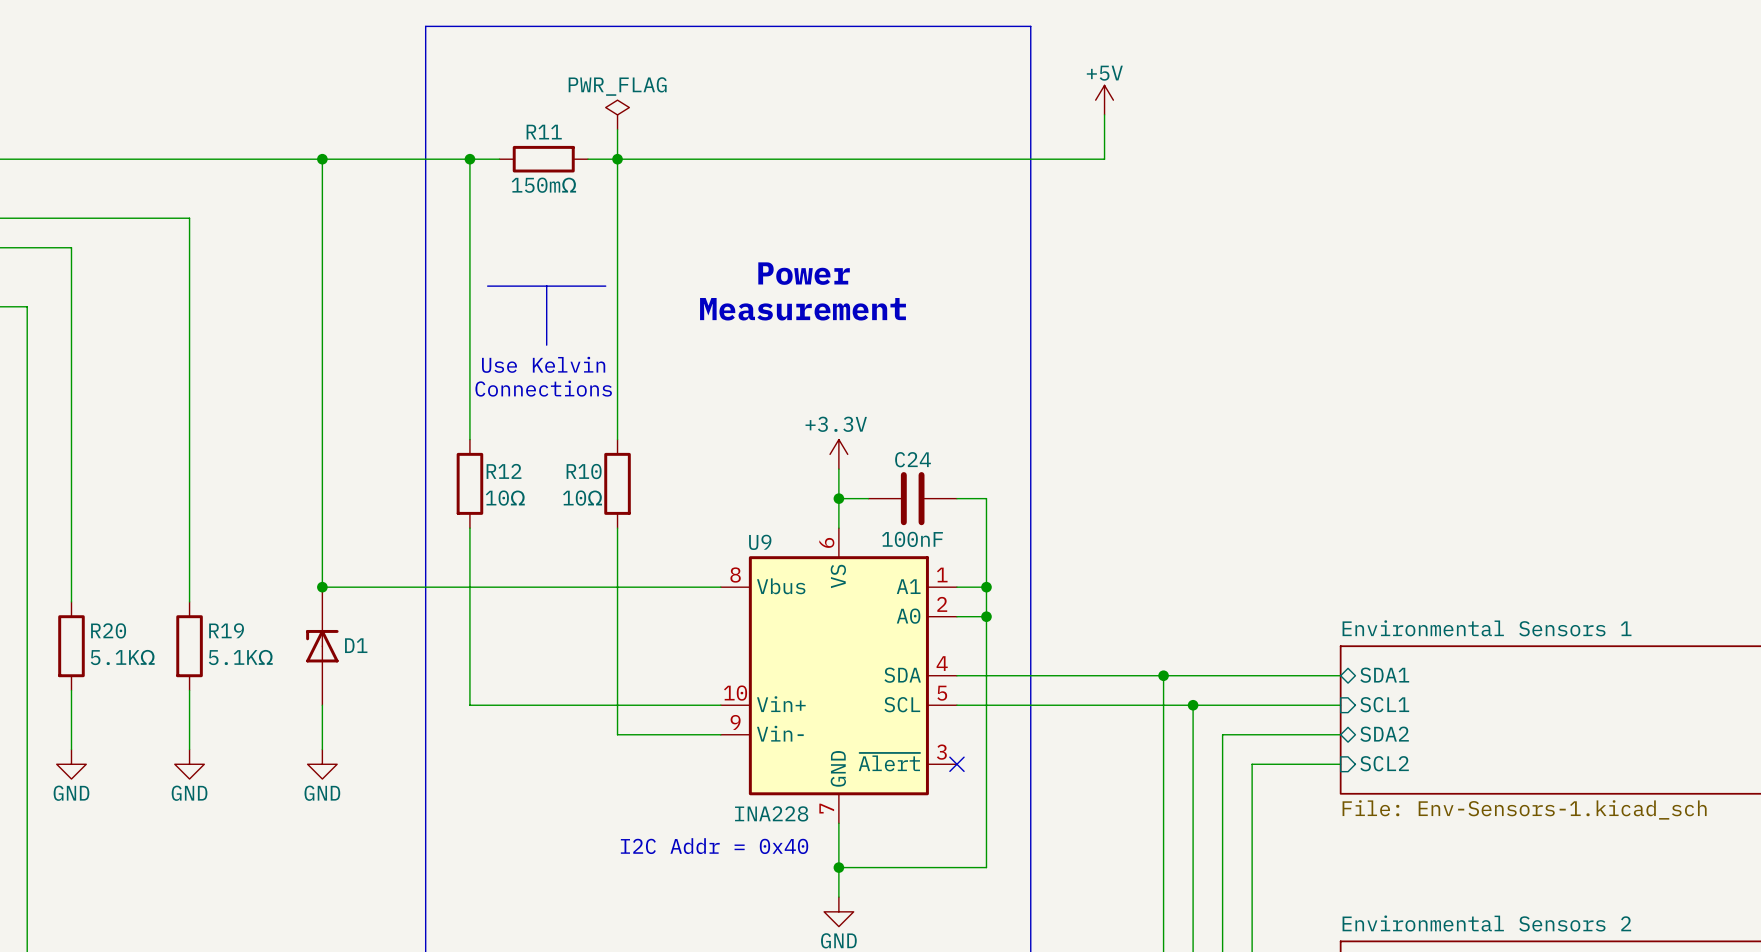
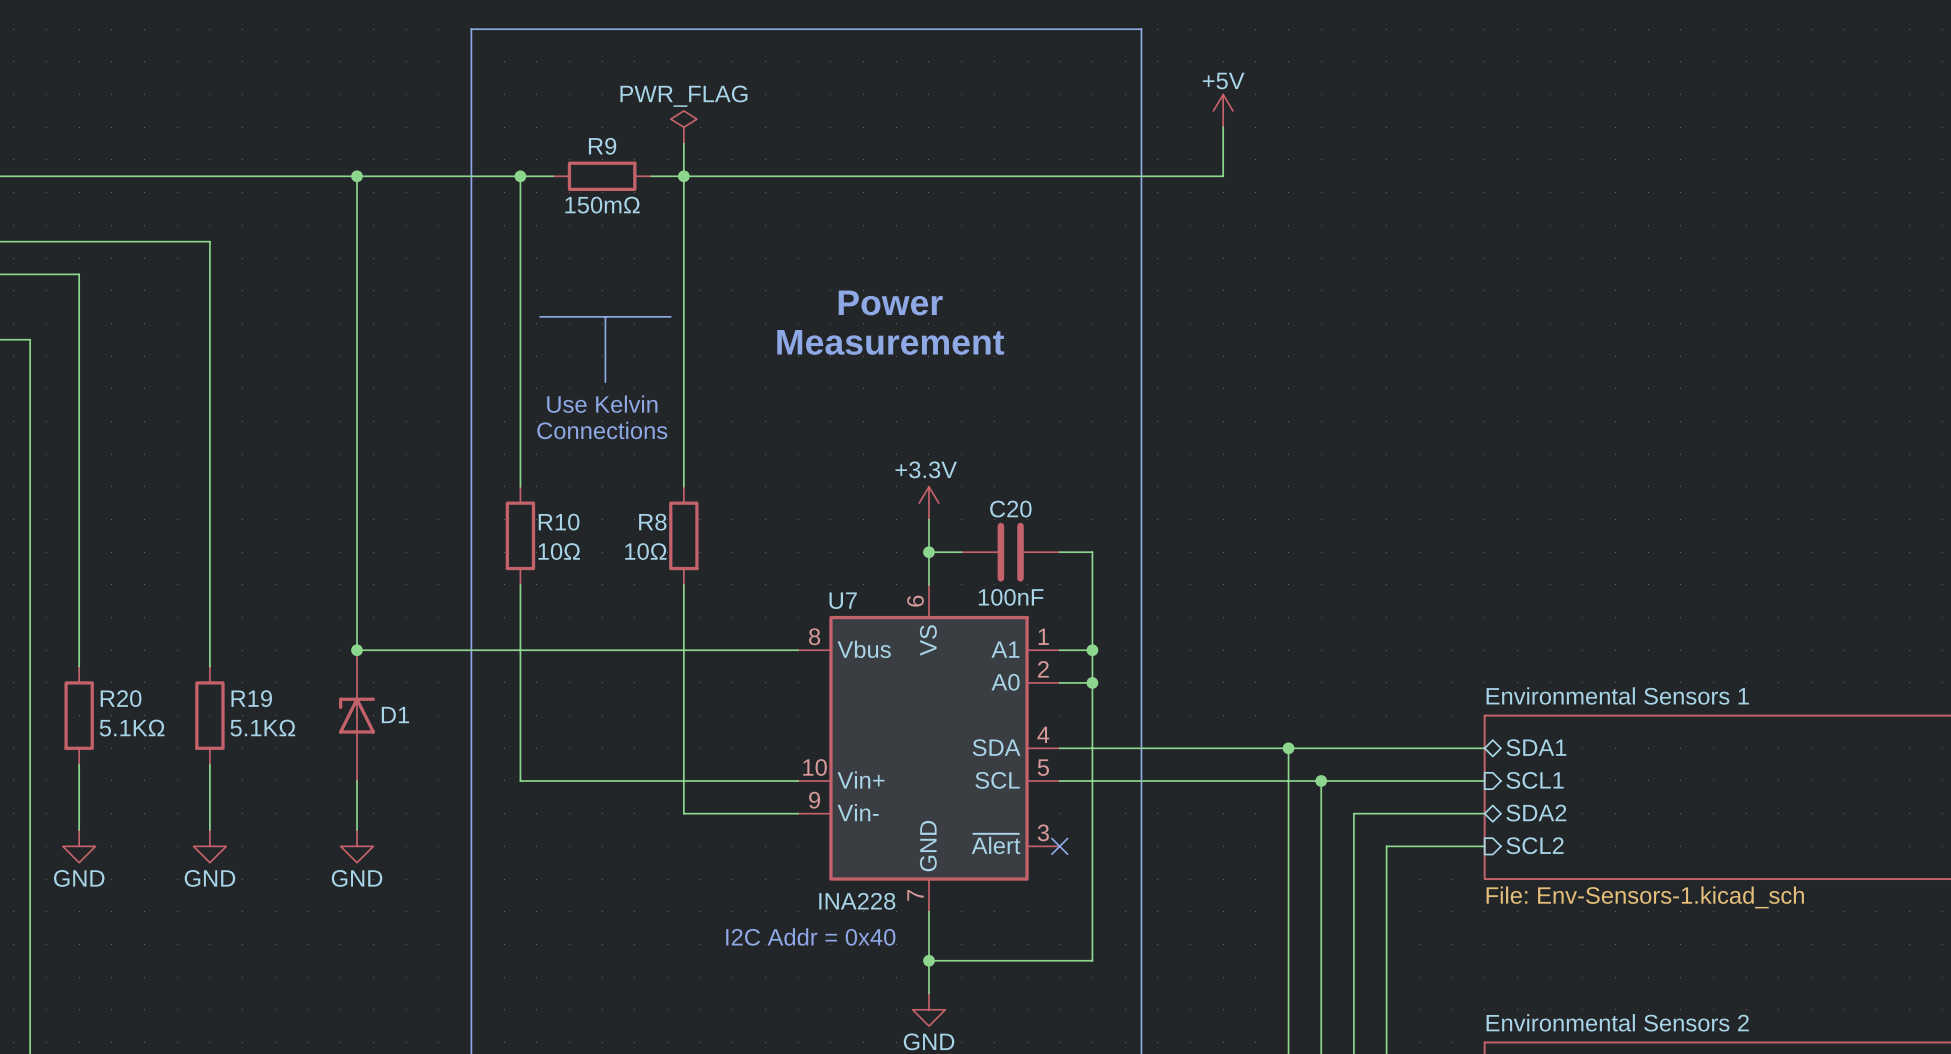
R11 name: R11 (544, 132) -> R9 (602, 146)
C24 name: C24 (913, 459) -> C20 (1010, 509)
R12 name: R12 (504, 471) -> R10 (559, 522)
R10 name: R10 (584, 471) -> R8 (652, 522)
U9 name: U9 (760, 542) -> U7 (843, 600)

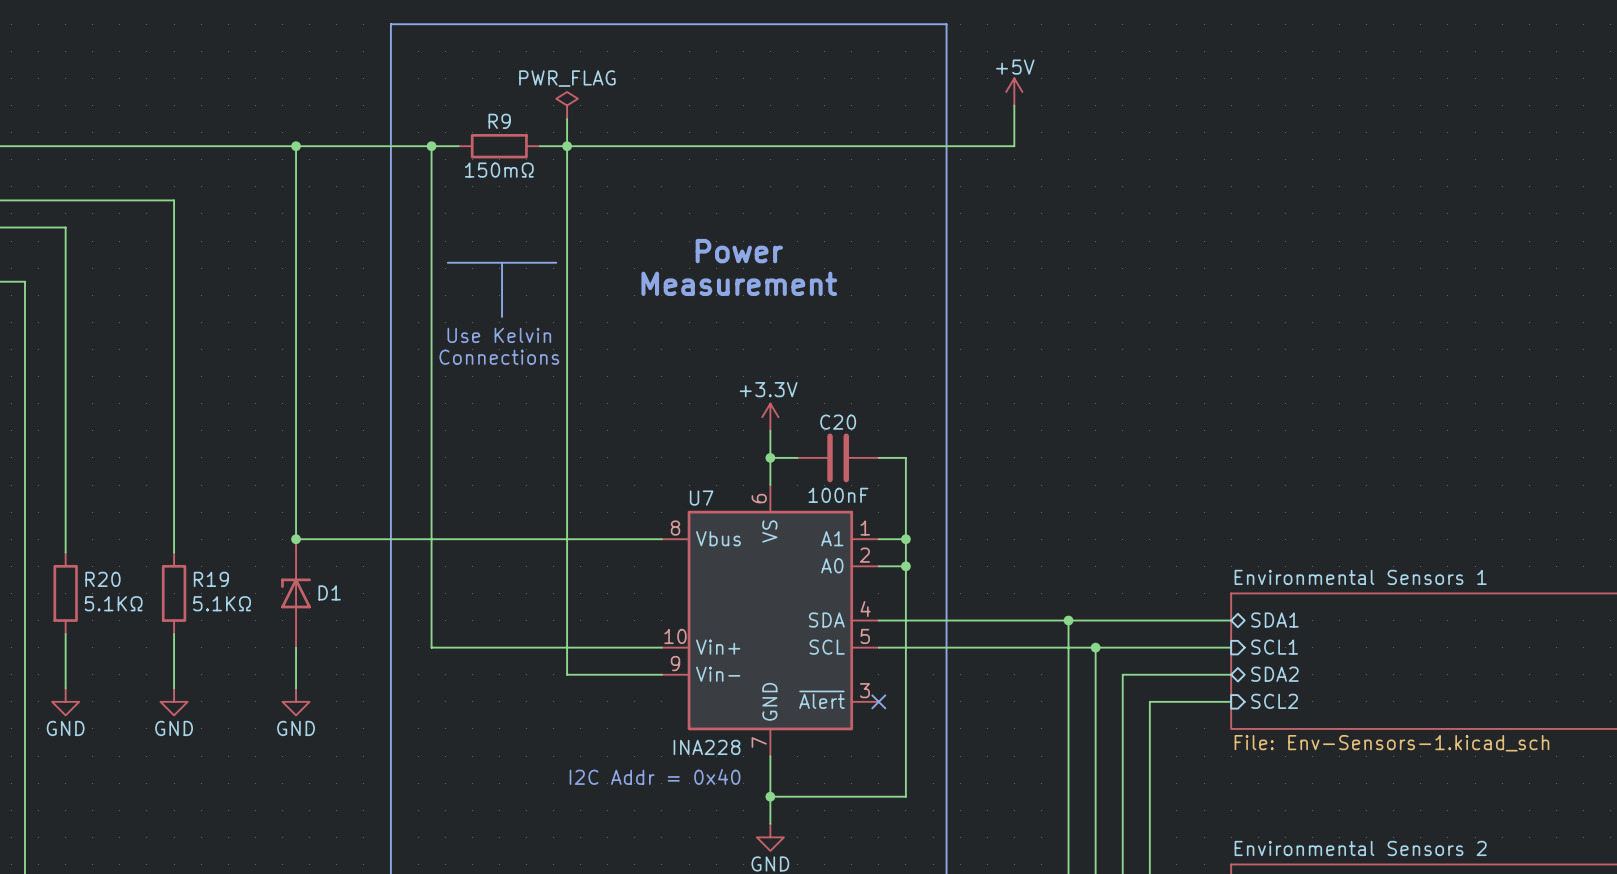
wire: none -> (431, 403) (431, 485)
wire: none -> (567, 403) (567, 485)
R10: 10Ω (520, 535) -> none
R8: 10Ω (683, 535) -> none

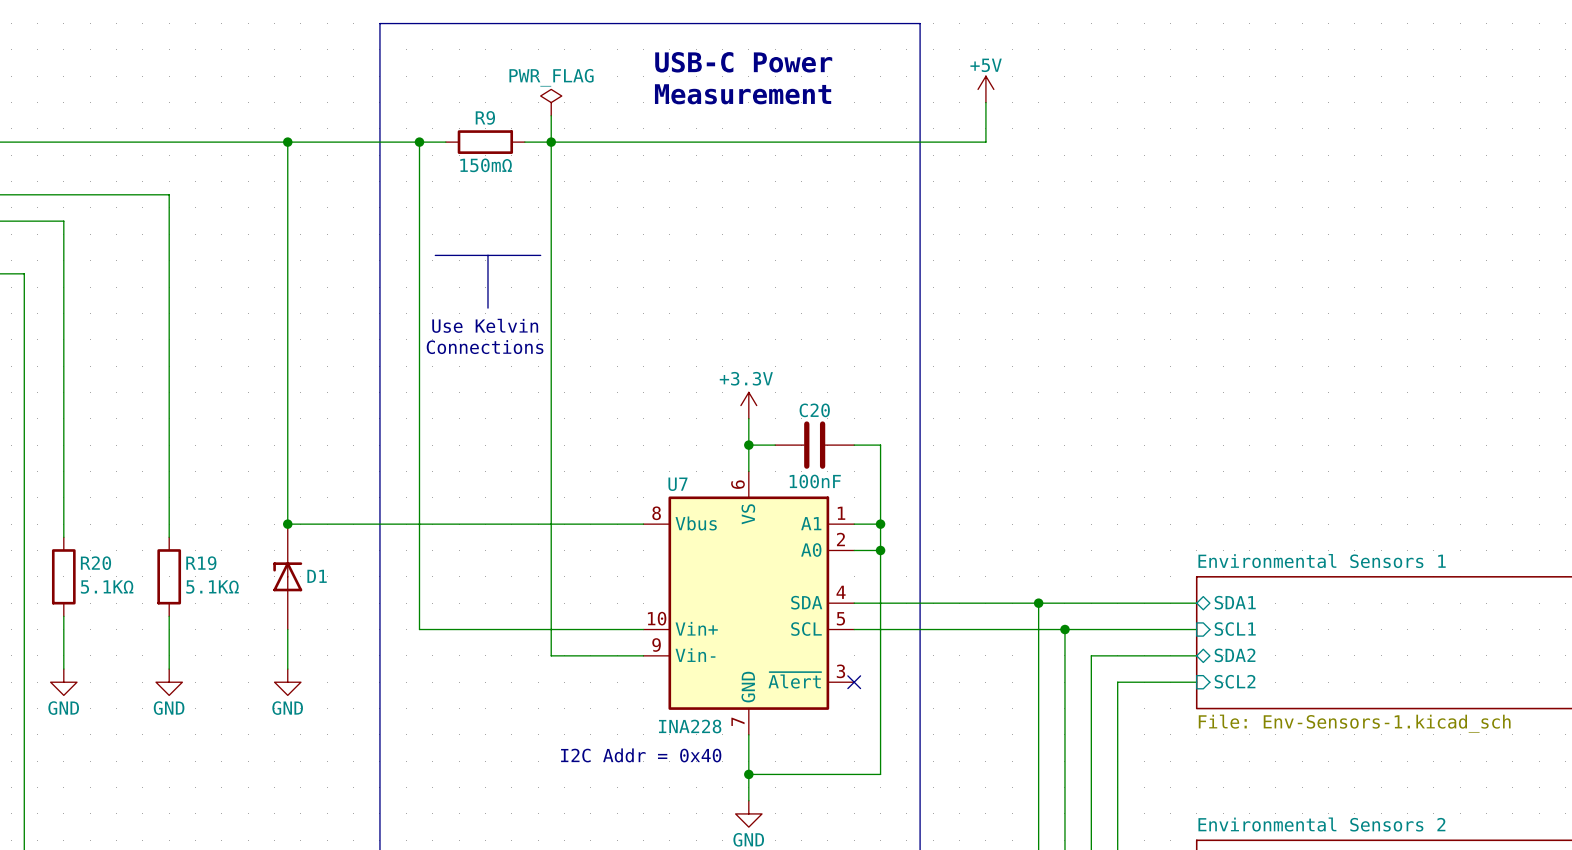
text: none -> USB-C Power (743, 62)
text: Power (739, 251) -> none
text position: Measurement (739, 283) -> Measurement (743, 94)

